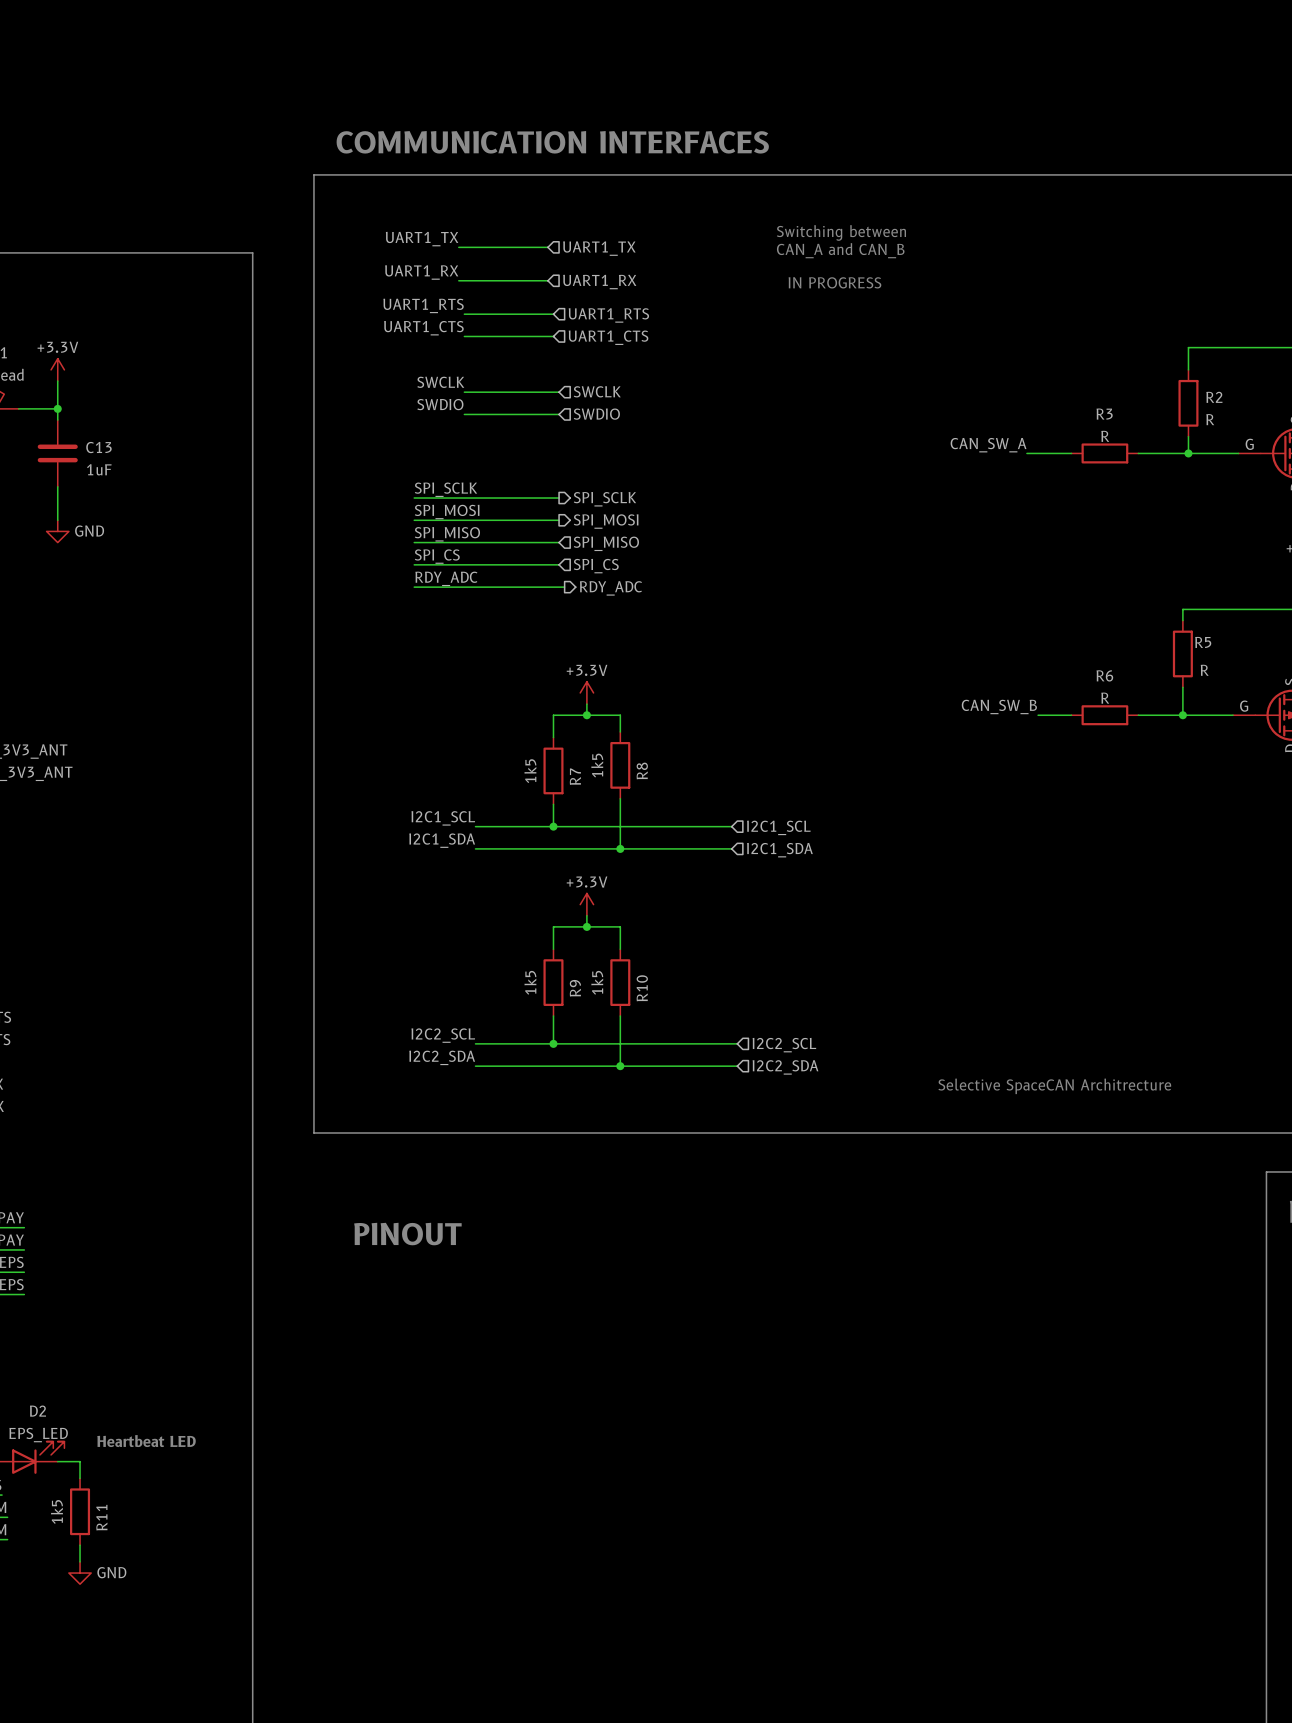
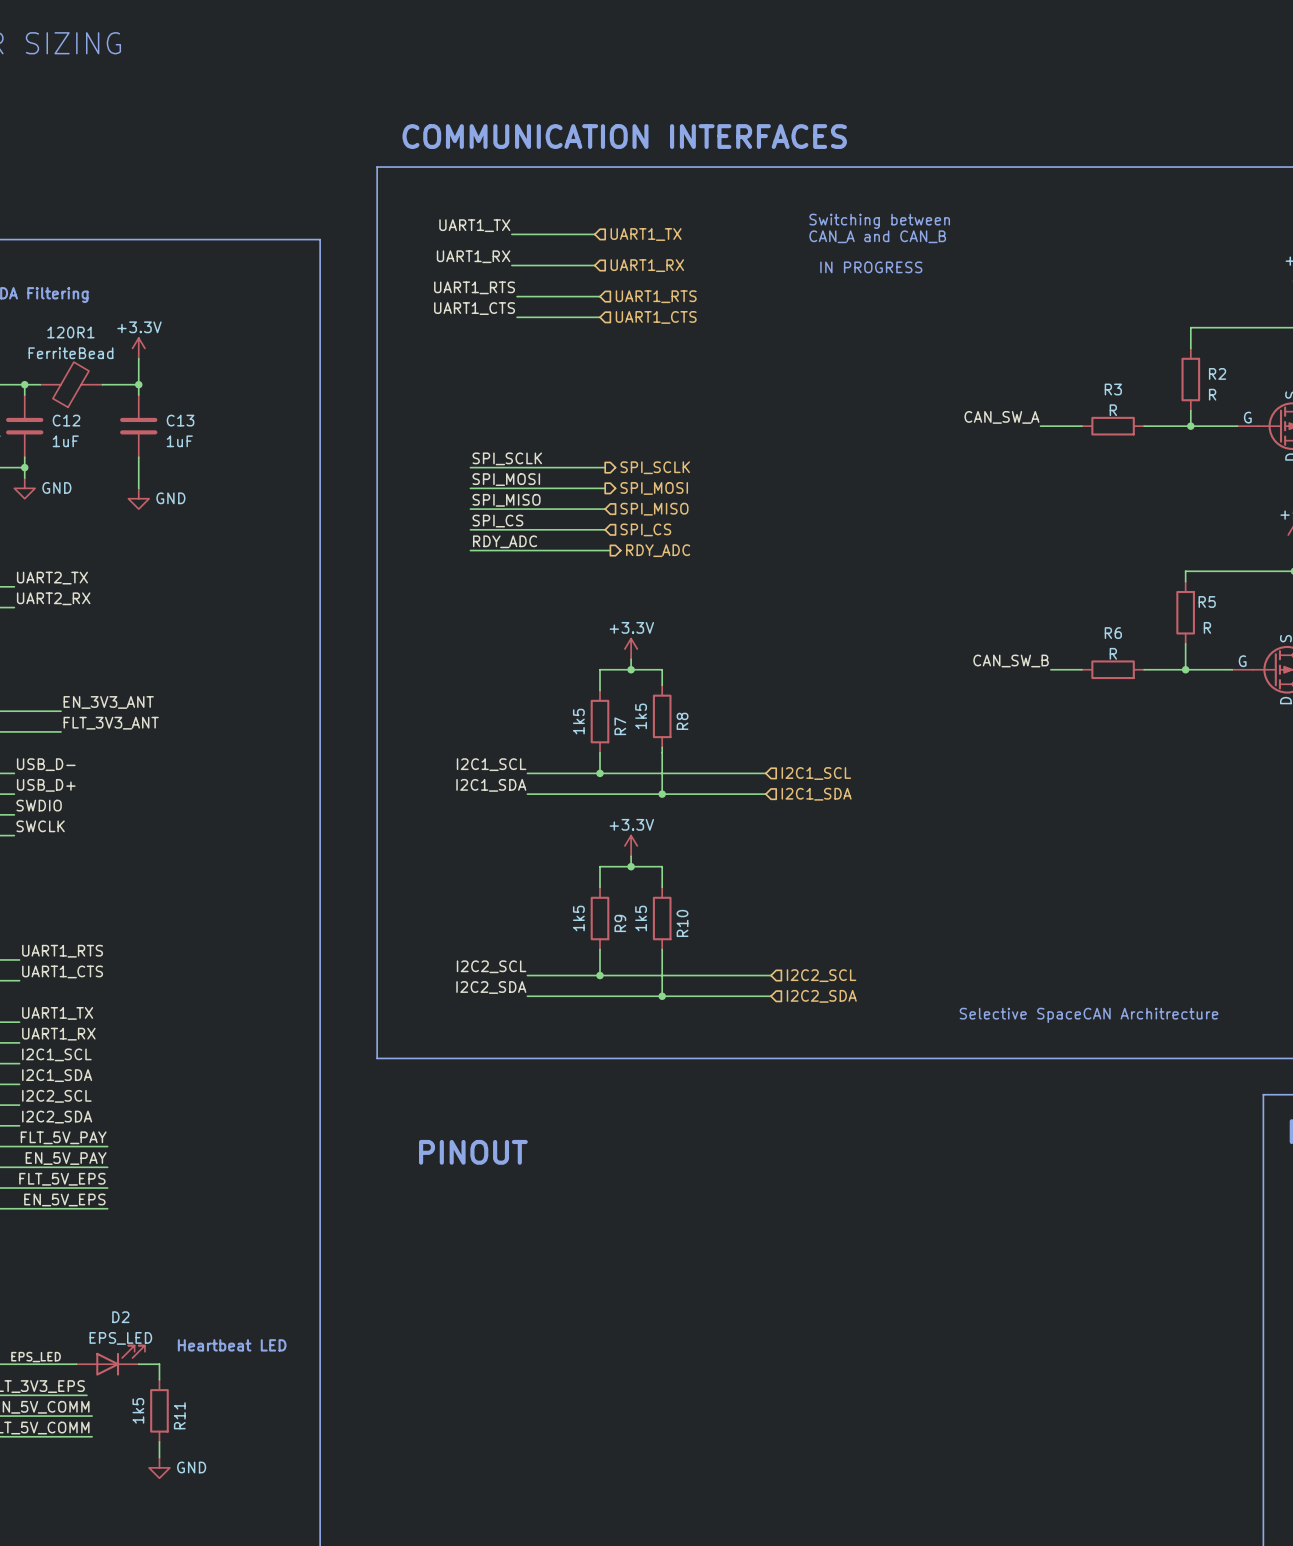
label: SWCLK (440, 382) -> none
hierarchical label: SWCLK (597, 391) -> none
wire: (464, 392) (559, 392) -> none
label: SWDIO (440, 404) -> none
wire: (464, 414) (559, 414) -> none
hierarchical label: SWDIO (596, 414) -> none

